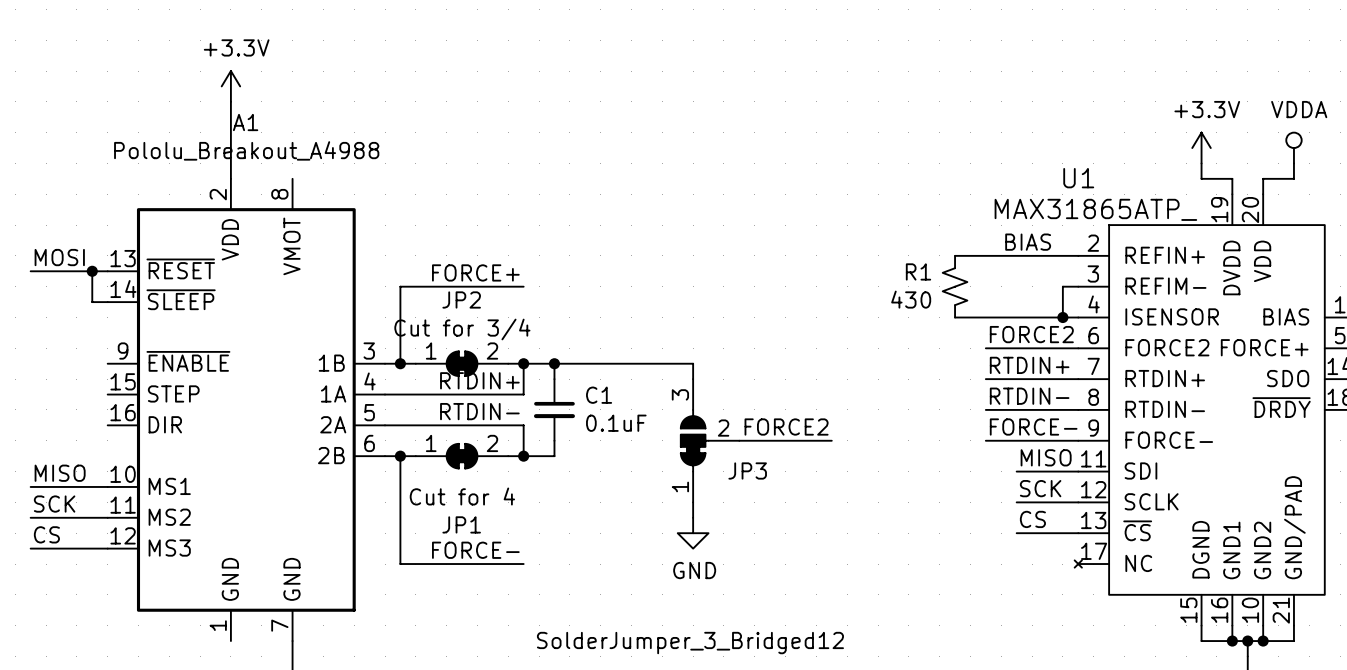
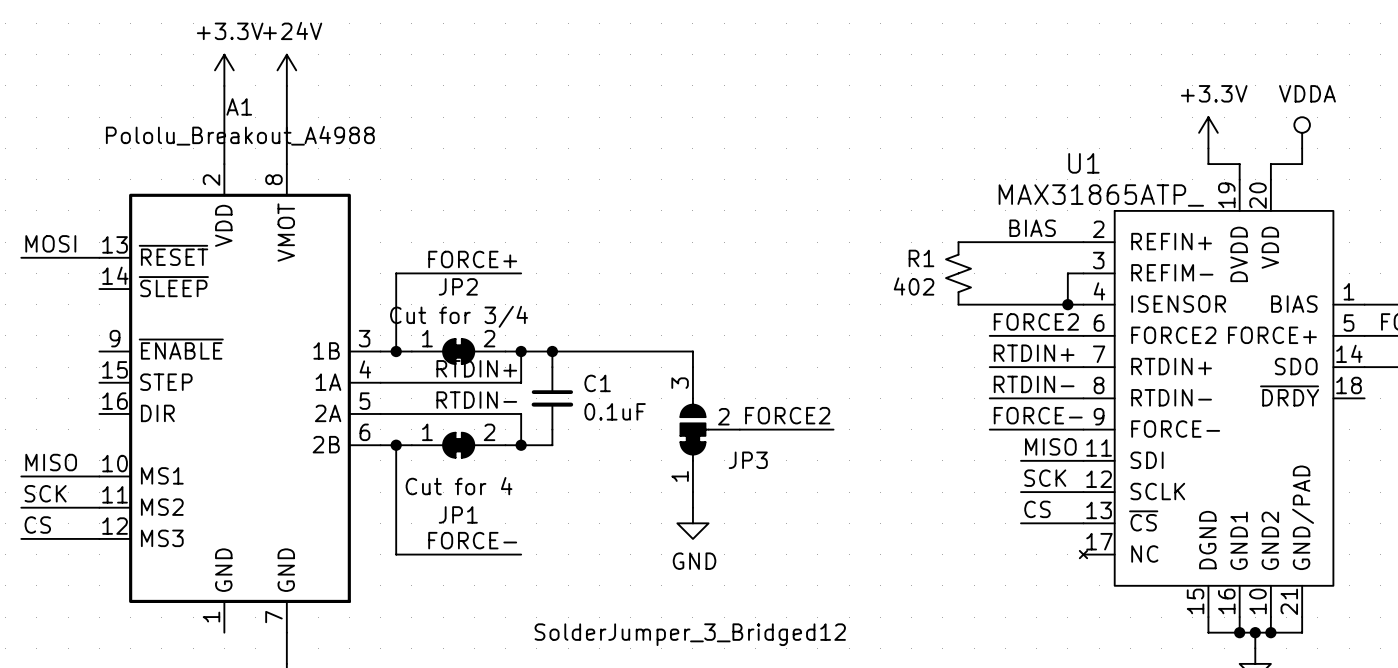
power symbol: none -> +24V (286, 70)
wire: none -> (286, 85) (286, 164)
wire: (92, 271) (92, 302) (107, 302) -> none
junction: (92, 271) -> none
R1 value: 430 (911, 299) -> 402 (914, 286)

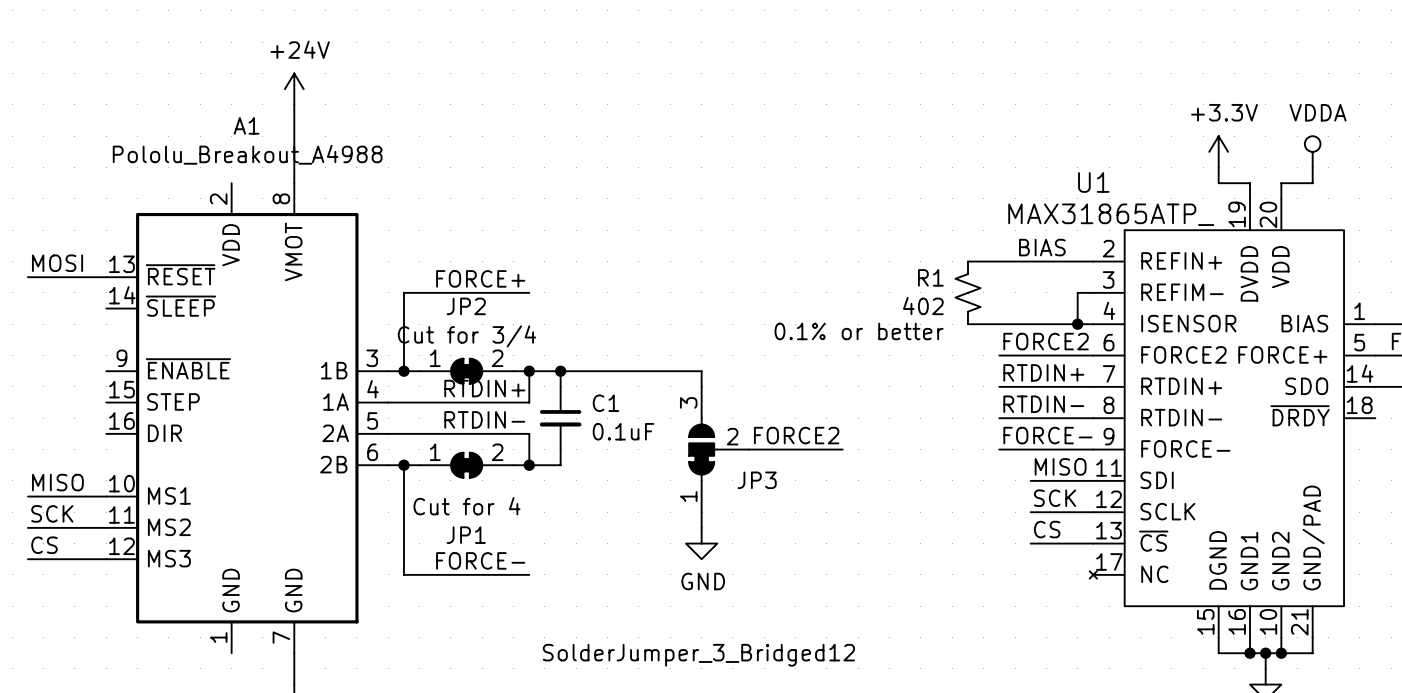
power symbol: +3.3V (224, 70) -> none
wire: (224, 85) (224, 164) -> none
R1 text: none -> 0.1% or better (859, 331)

